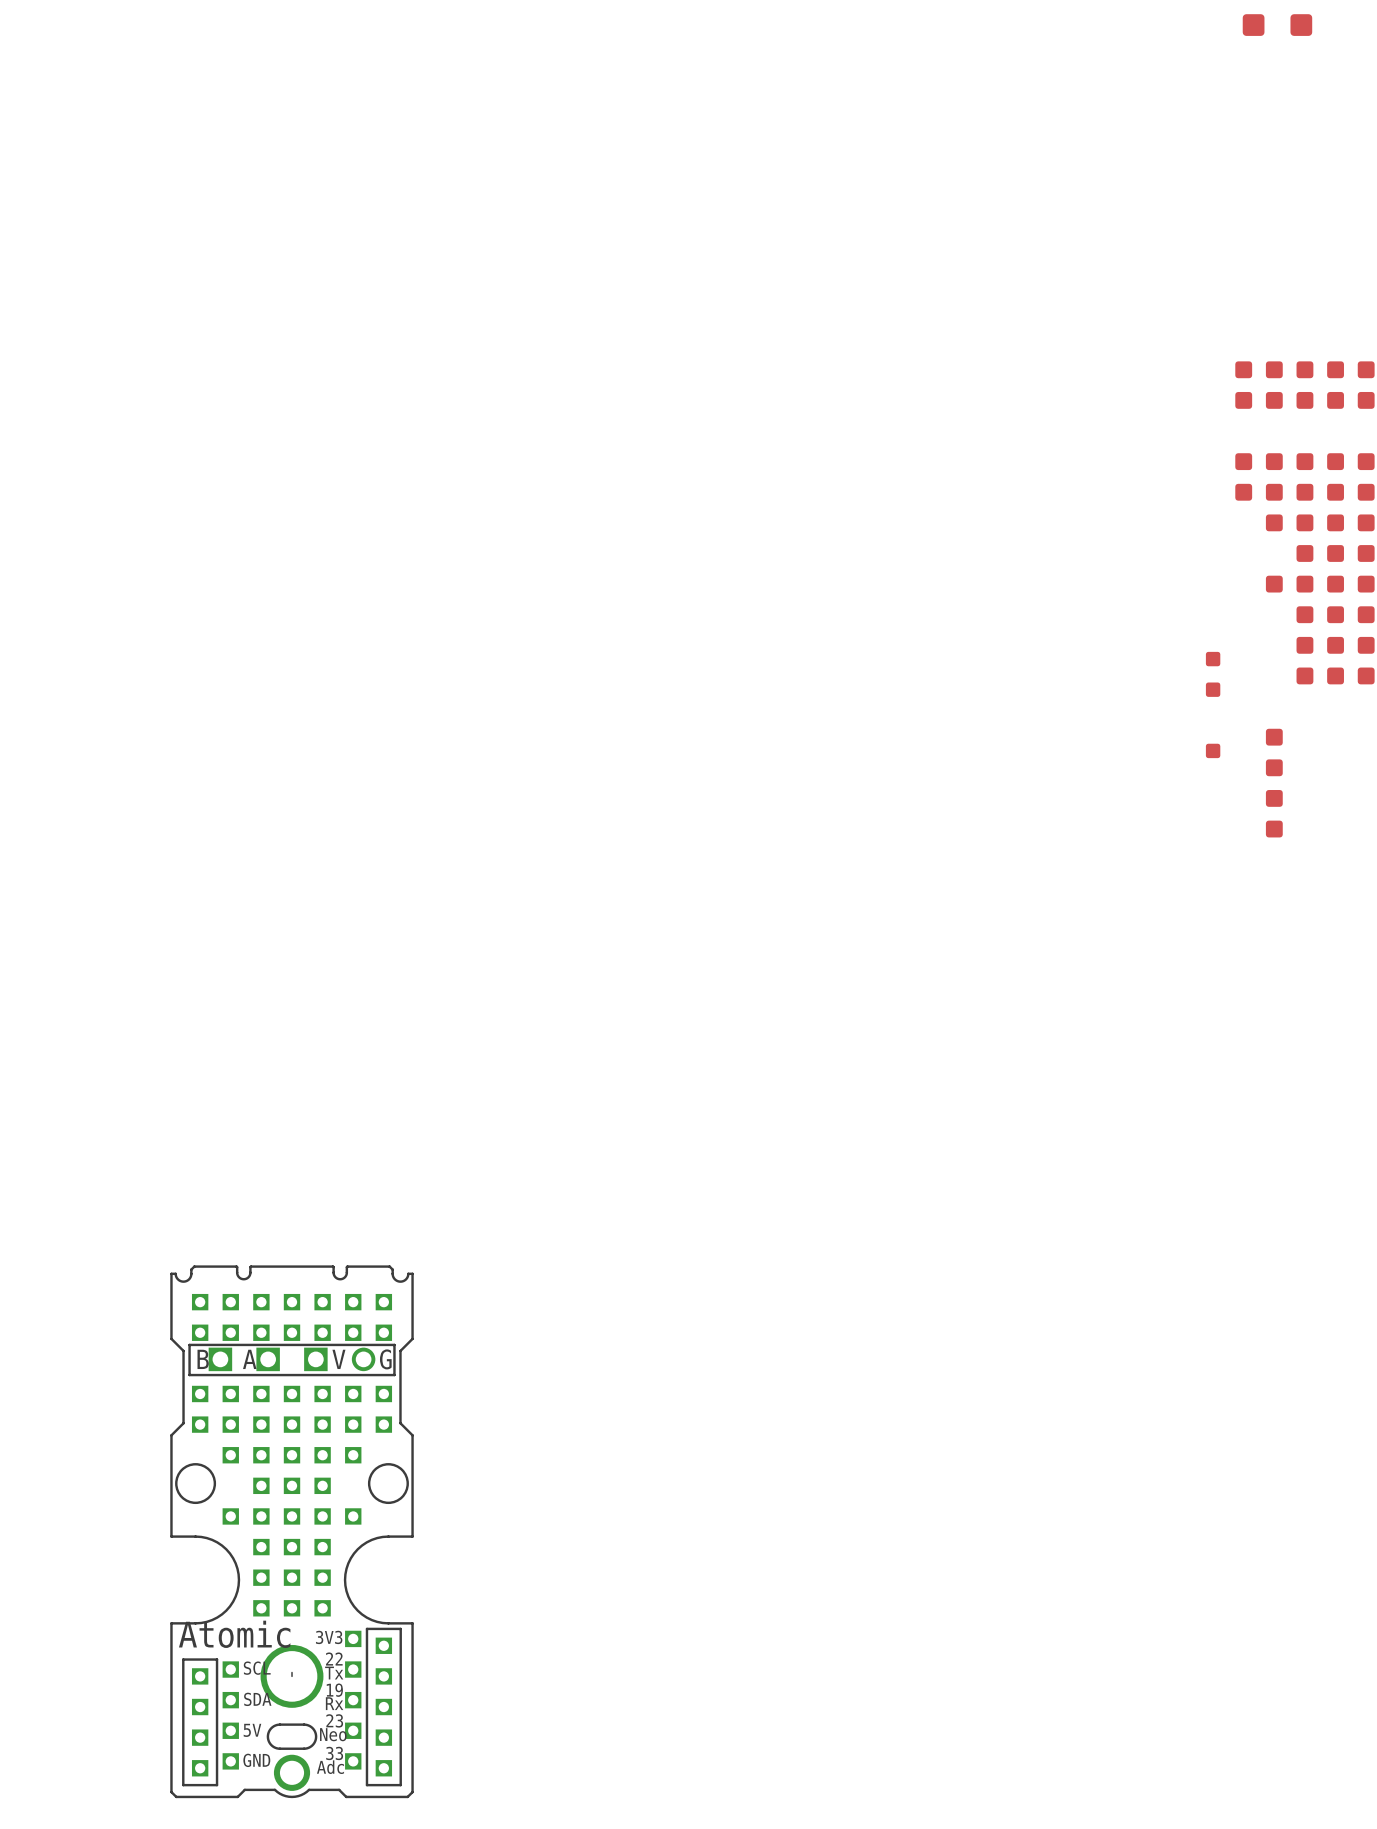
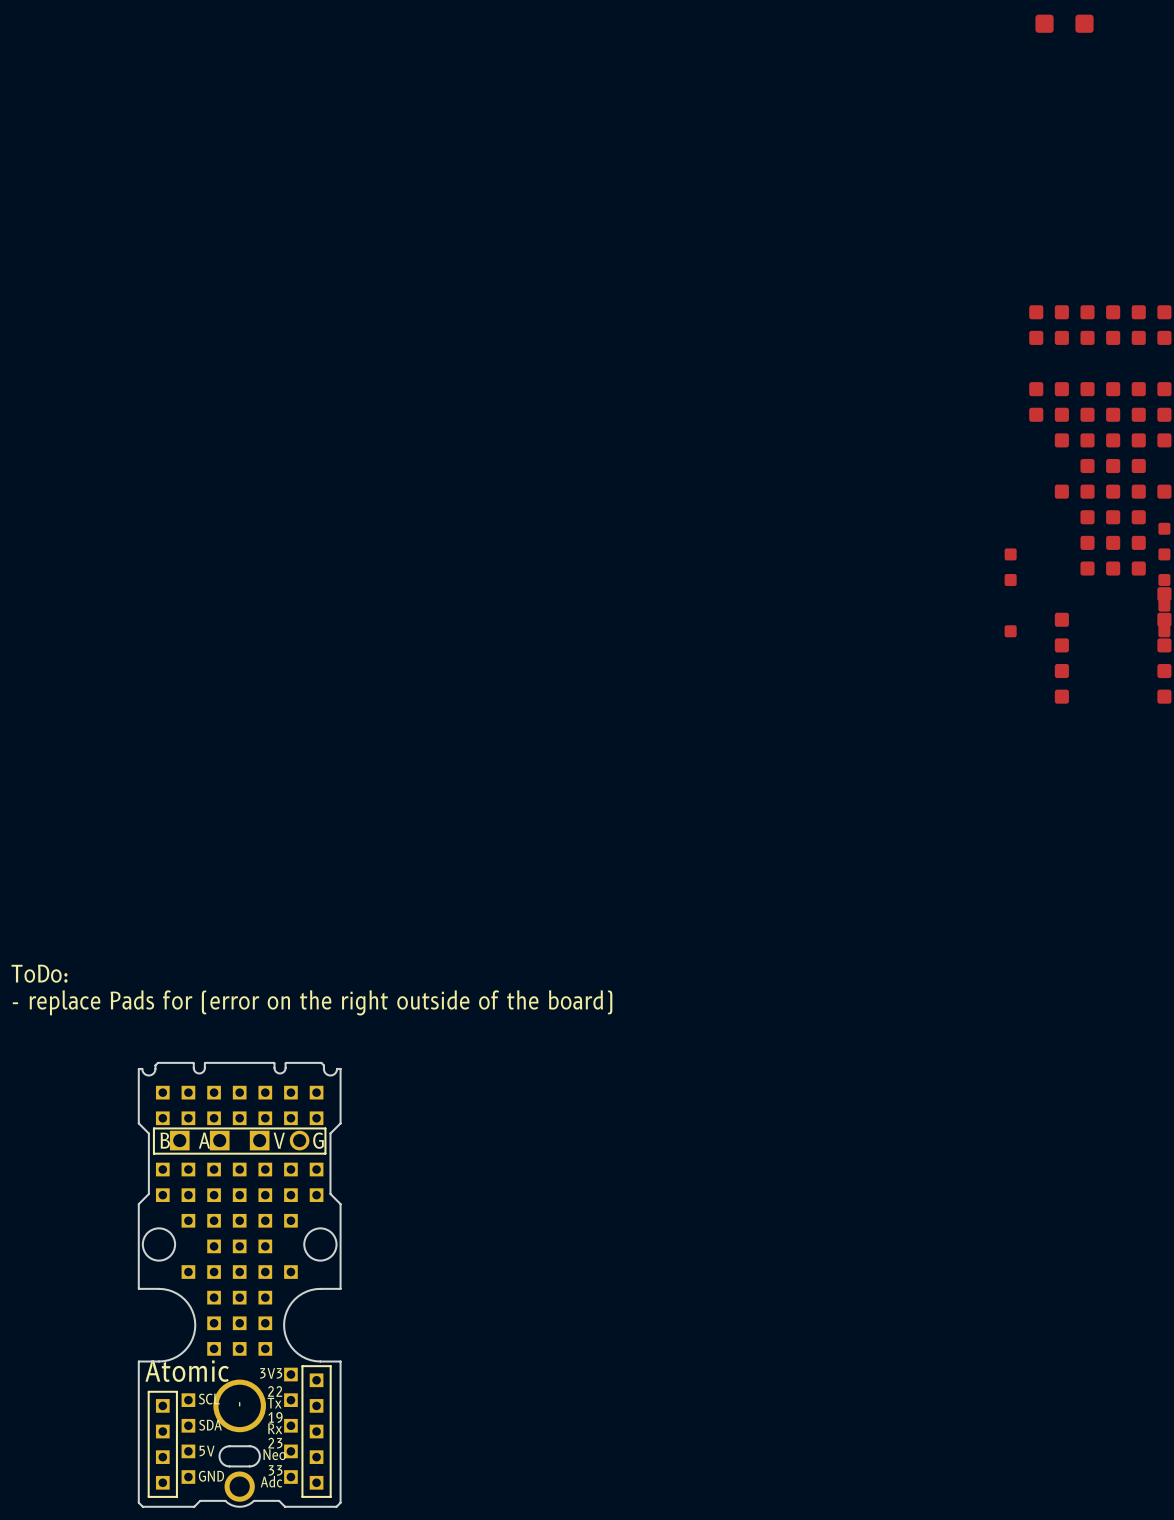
text: none -> ToDo: (39, 973)
text: none -> - replace Pads for (error on the right outside of the board) (312, 1002)
line: (236, 1266) (194, 1266) (191, 1269) (190, 1277) (184, 1281) (178, 1280) (175, 1273) (171, 1273) (171, 1338) (183, 1350) (183, 1423) (171, 1435) (171, 1536) (201, 1536) (217, 1542) (233, 1558) (238, 1579) (233, 1601) (217, 1617) (201, 1622) (171, 1623) (171, 1792) (176, 1796) (237, 1796) (244, 1789) (274, 1789) (282, 1795) (292, 1796) (301, 1795) (309, 1789) (339, 1789) (346, 1796) (407, 1796) (412, 1792) (412, 1623) (382, 1622) (366, 1617) (350, 1601) (345, 1579) (350, 1558) (366, 1542) (382, 1536) (412, 1536) (412, 1435) (400, 1423) (400, 1350) (412, 1338) (412, 1273) (408, 1273) (405, 1280) (399, 1281) (393, 1277) (392, 1269) (389, 1266) (347, 1266) -> none
board edge: none -> (193, 1062) (157, 1062) (155, 1065) (154, 1072) (149, 1075) (144, 1074) (142, 1068) (138, 1068) (138, 1123) (148, 1133) (148, 1194) (138, 1204) (138, 1288) (163, 1289) (177, 1293) (190, 1307) (195, 1325) (190, 1343) (177, 1356) (163, 1361) (138, 1361) (138, 1502) (142, 1506) (194, 1506) (200, 1500) (225, 1500) (231, 1505) (239, 1506) (247, 1505) (253, 1500) (279, 1500) (285, 1506) (336, 1506) (340, 1502) (340, 1361) (315, 1361) (302, 1356) (288, 1343) (284, 1325) (288, 1307) (302, 1293) (315, 1289) (340, 1288) (340, 1204) (330, 1194) (330, 1133) (340, 1123) (340, 1068) (337, 1068) (334, 1074) (329, 1075) (324, 1072) (323, 1065) (321, 1062) (286, 1062)
line: (251, 1266) (332, 1266) -> none
board edge: none -> (205, 1062) (273, 1062)
line: (237, 1267) (238, 1275) (243, 1279) (249, 1275) (250, 1267) -> none
board edge: none -> (193, 1063) (194, 1070) (199, 1073) (204, 1070) (204, 1063)
line: (333, 1267) (334, 1275) (340, 1279) (345, 1275) (346, 1267) -> none
board edge: none -> (274, 1063) (275, 1070) (280, 1073) (284, 1070) (285, 1063)
drawing: [175, 1463, 217, 1505] -> none
round board edge: none -> [141, 1227, 177, 1262]
drawing: [367, 1463, 409, 1505] -> none
round board edge: none -> [303, 1227, 338, 1262]
line: (279, 1724) (310, 1726) (315, 1733) (314, 1742) (305, 1748) (273, 1747) (268, 1741) (268, 1733) (272, 1727) (279, 1724) -> none
board edge: none -> (229, 1446) (254, 1447) (259, 1453) (258, 1461) (251, 1466) (224, 1465) (220, 1460) (219, 1453) (223, 1448) (229, 1446)

